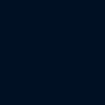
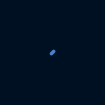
bottom track: none -> (53, 51) (51, 53)

